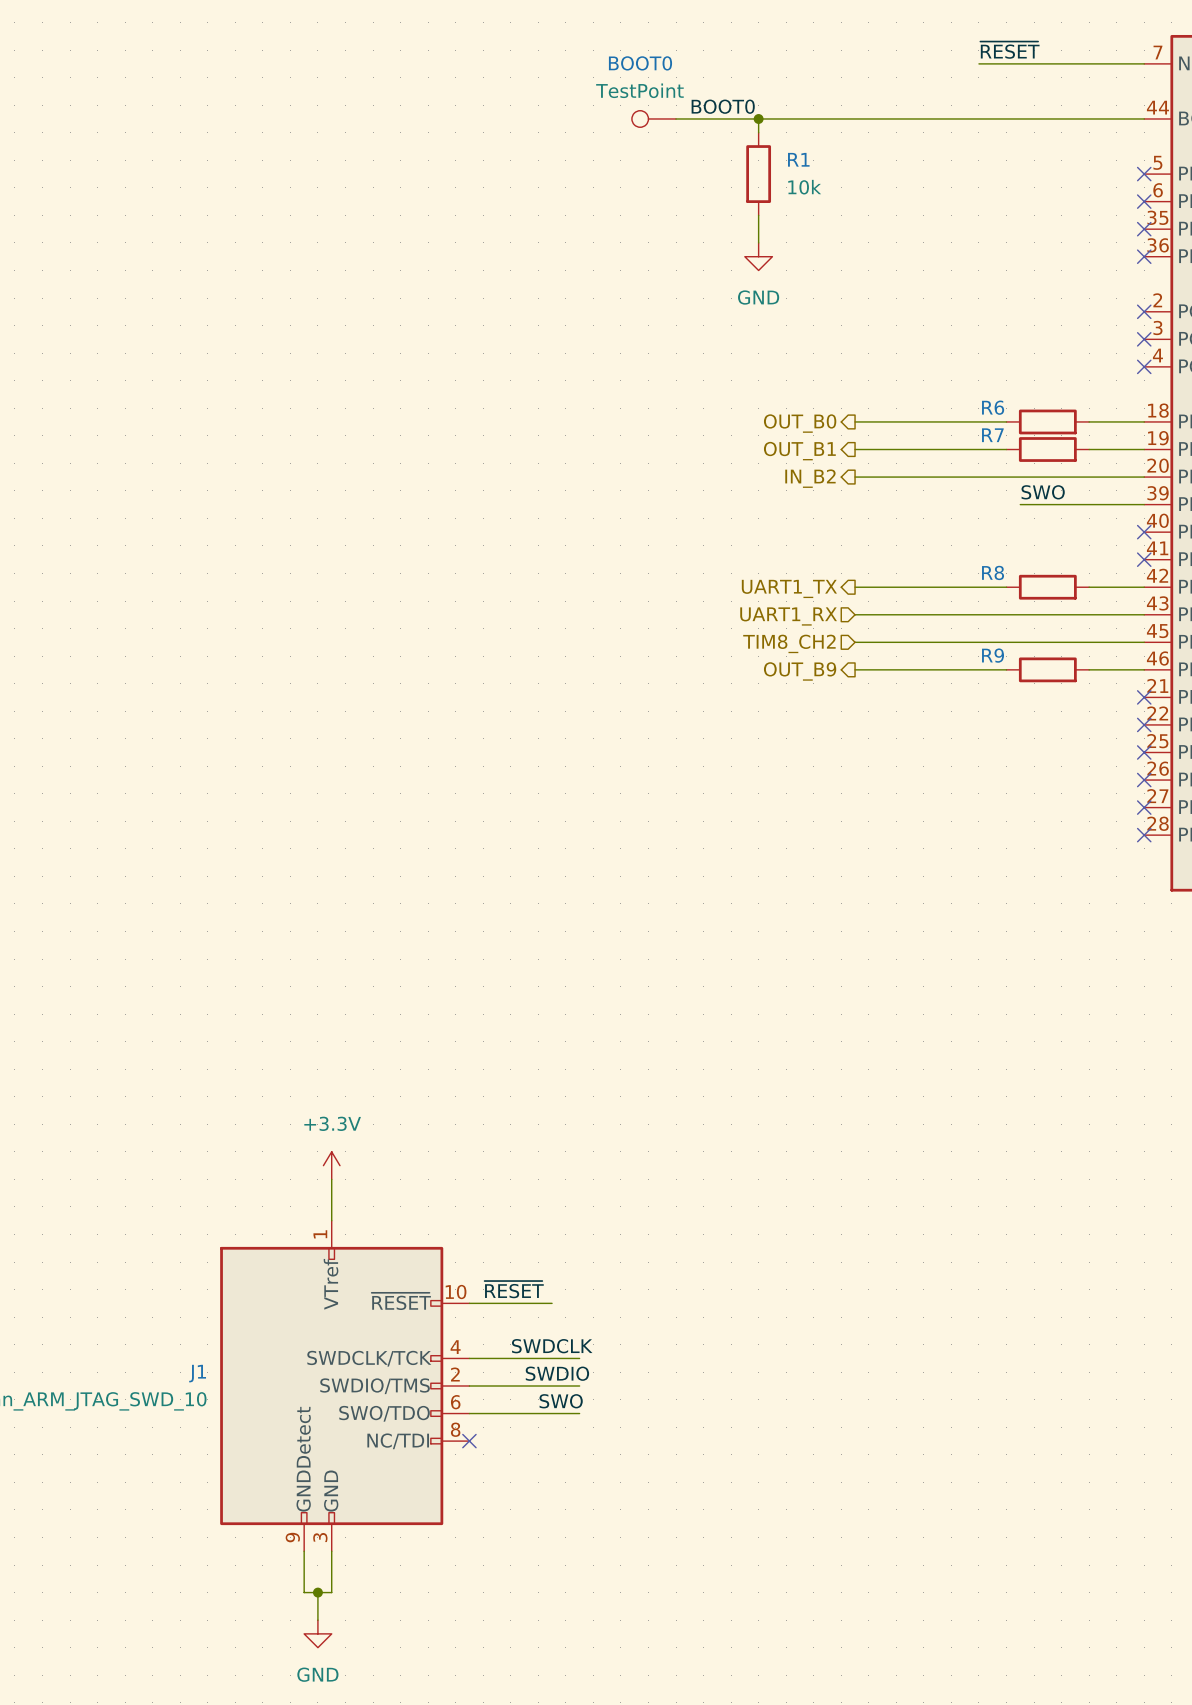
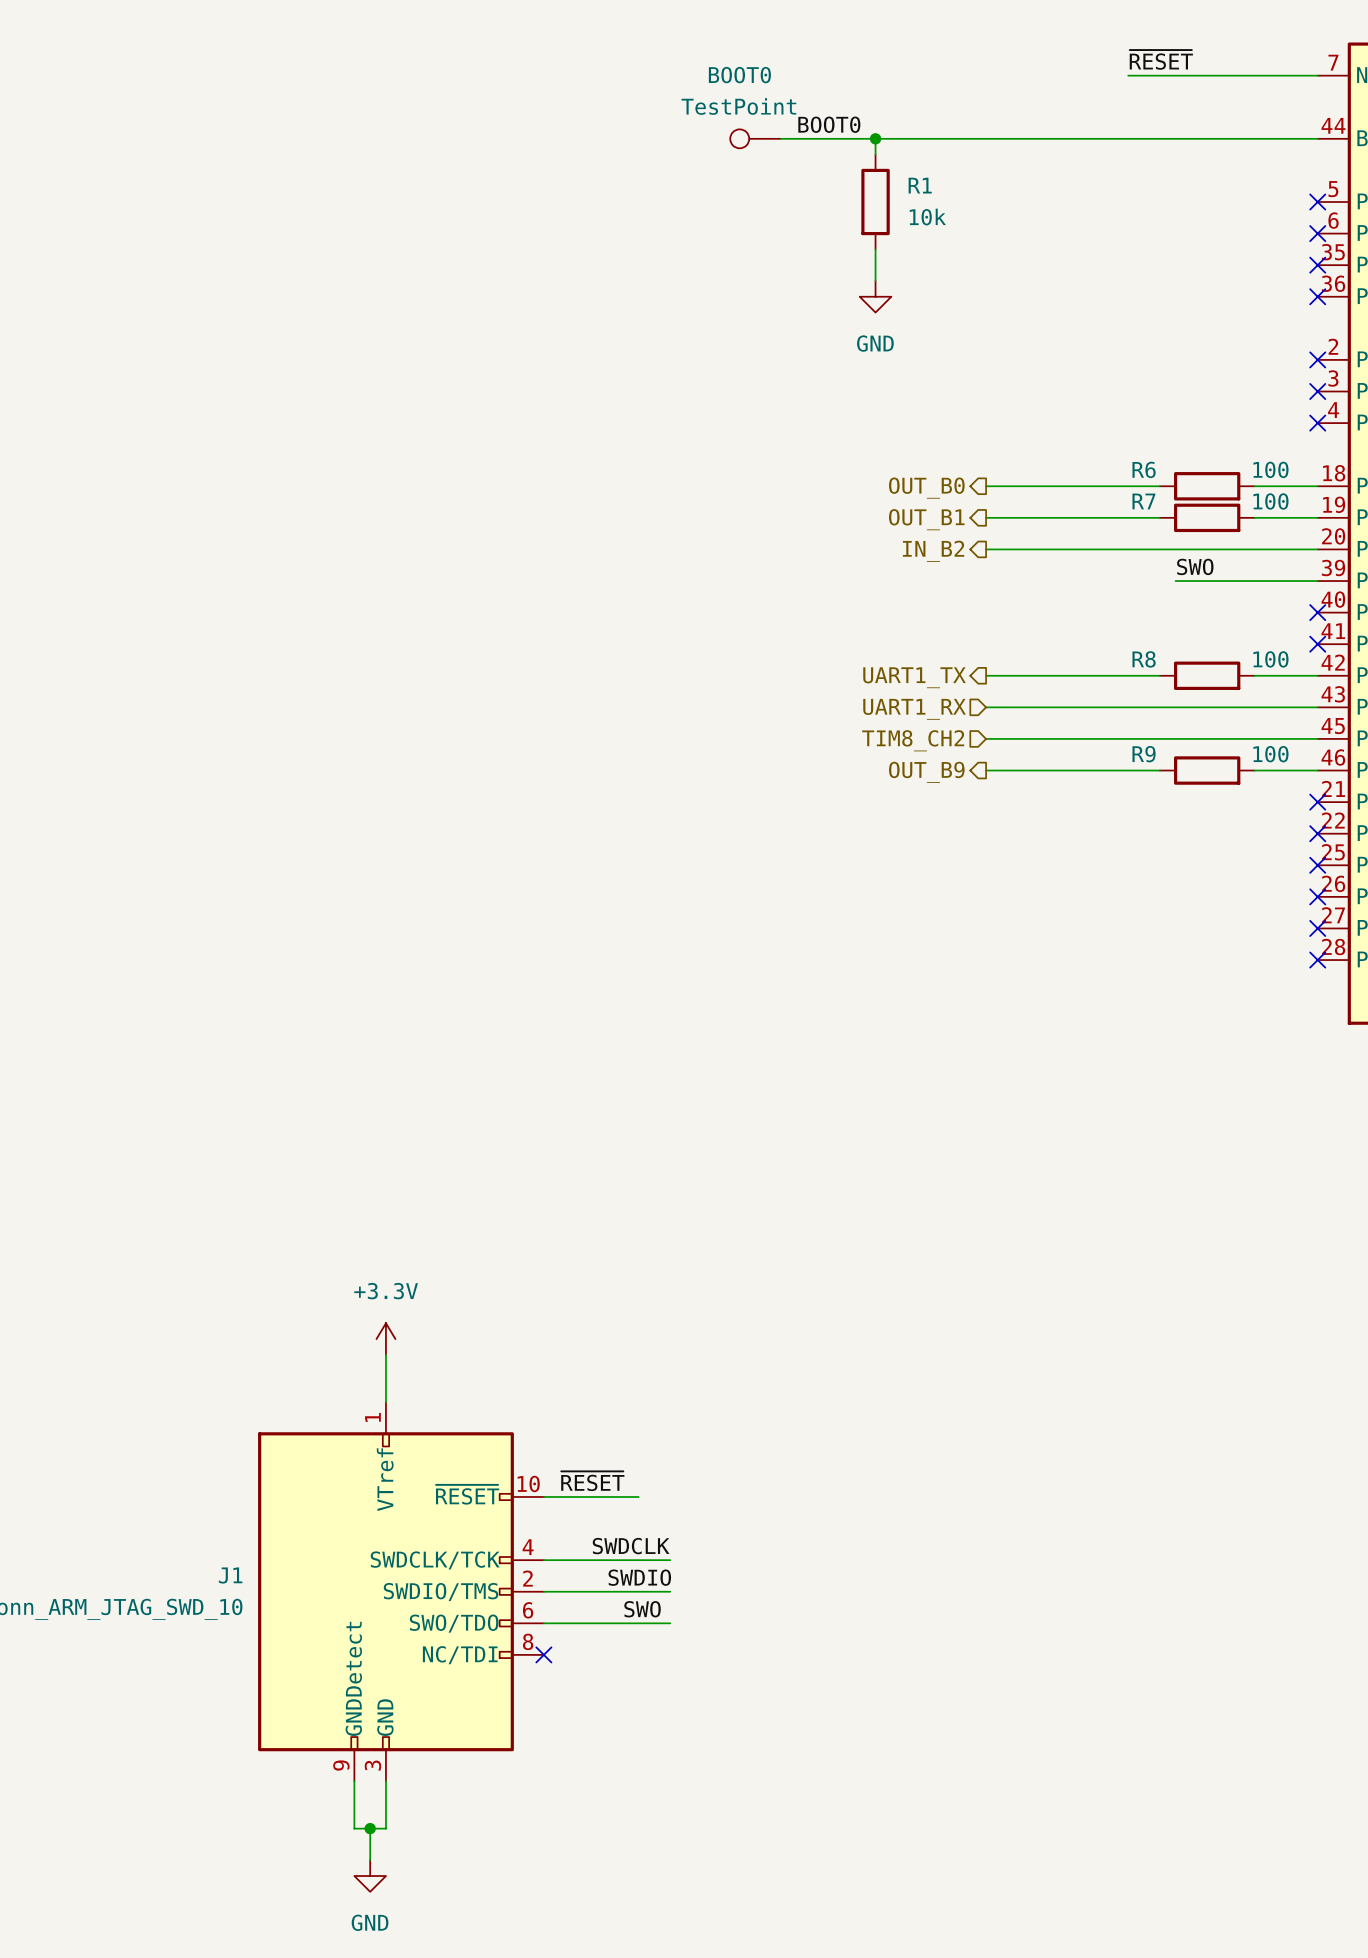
R6 value: none -> 100 (1270, 469)
R7 value: none -> 100 (1270, 501)
R8 value: none -> 100 (1270, 659)
R9 value: none -> 100 (1270, 754)

